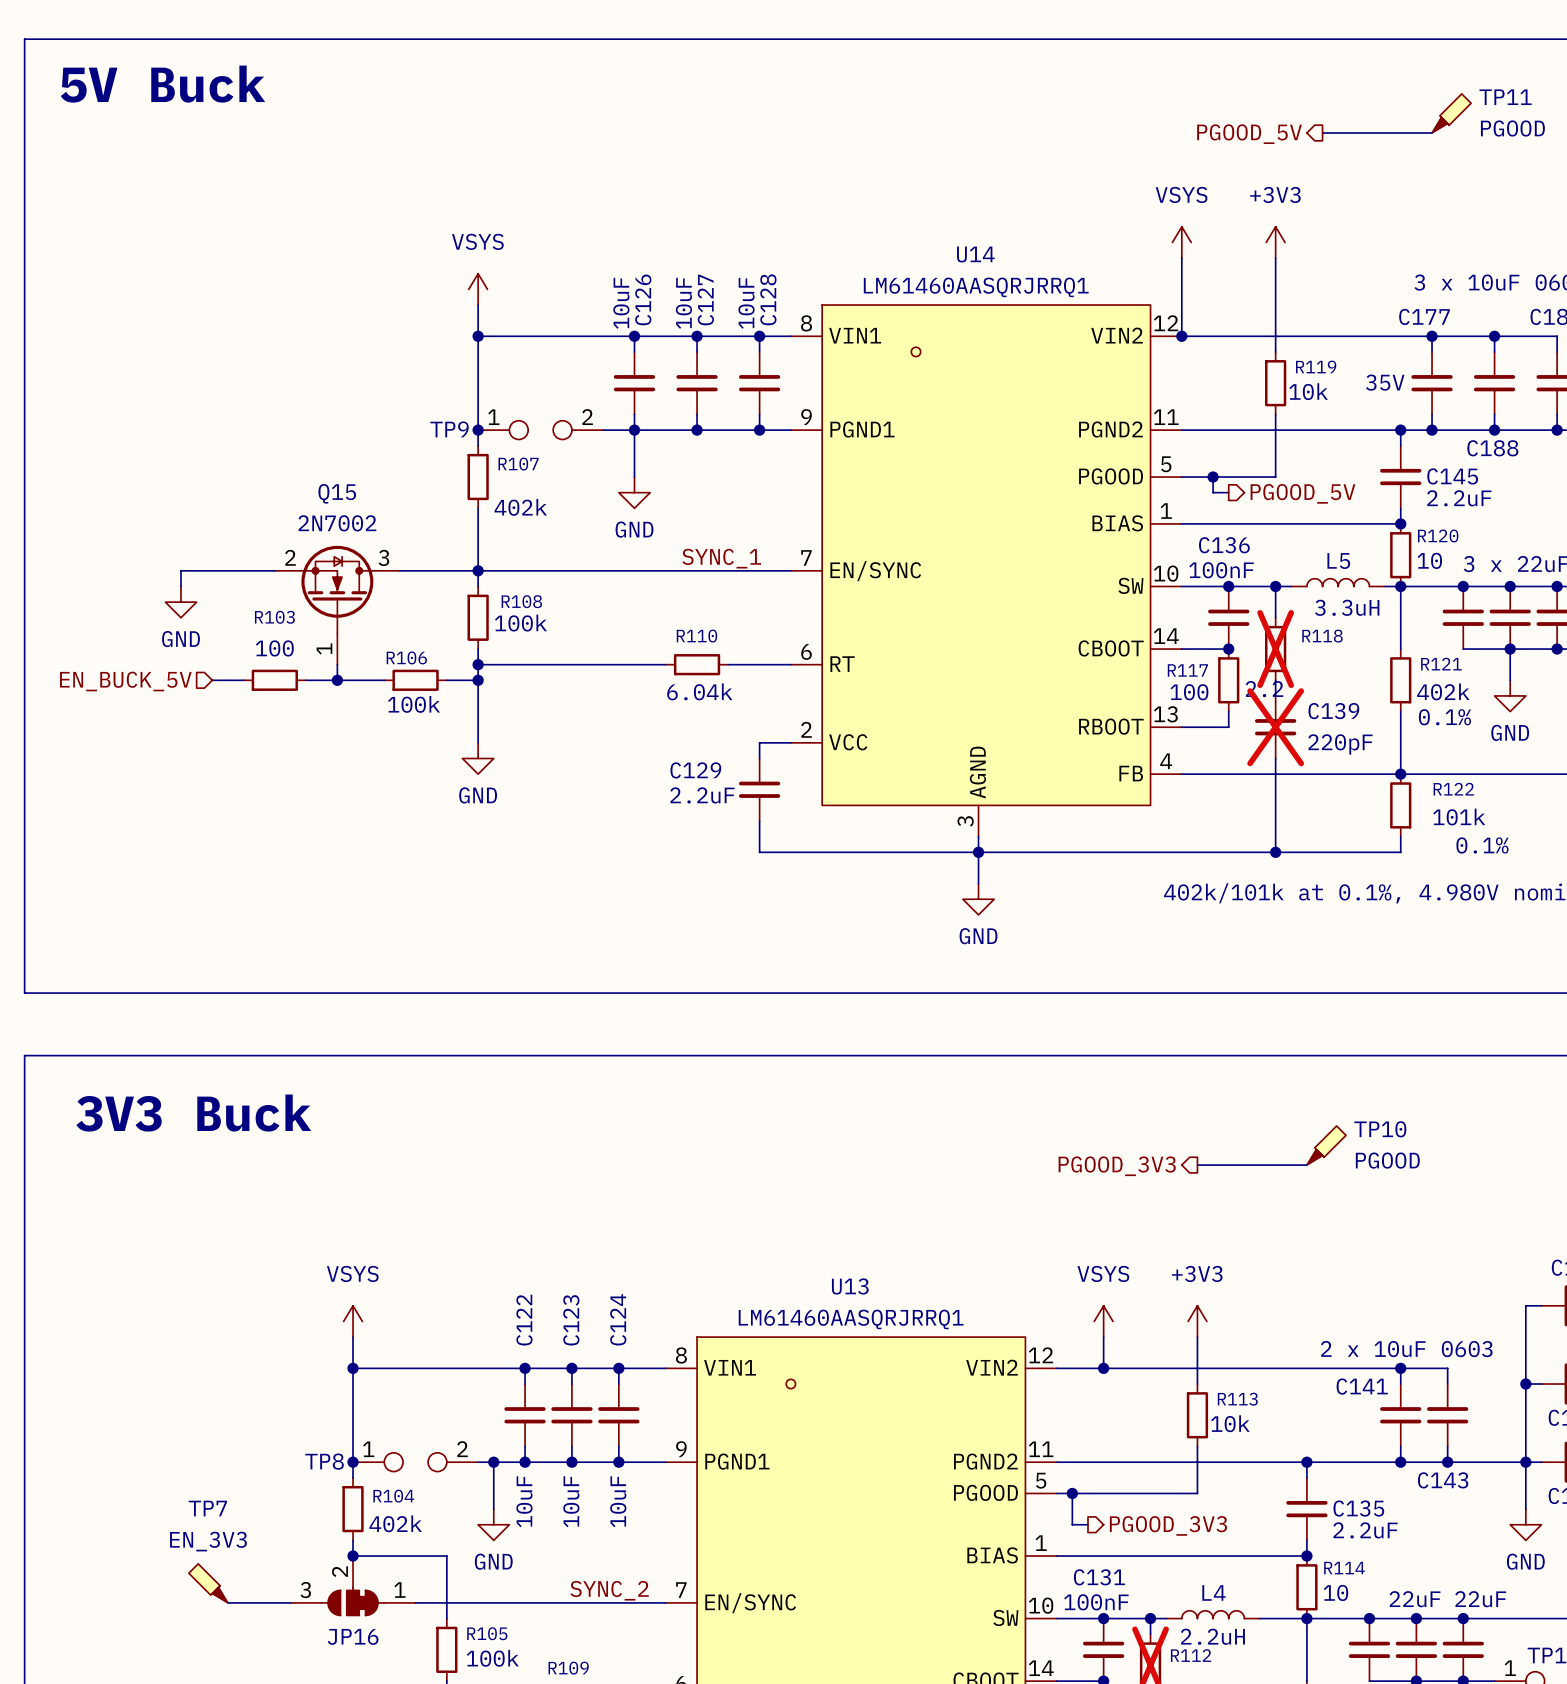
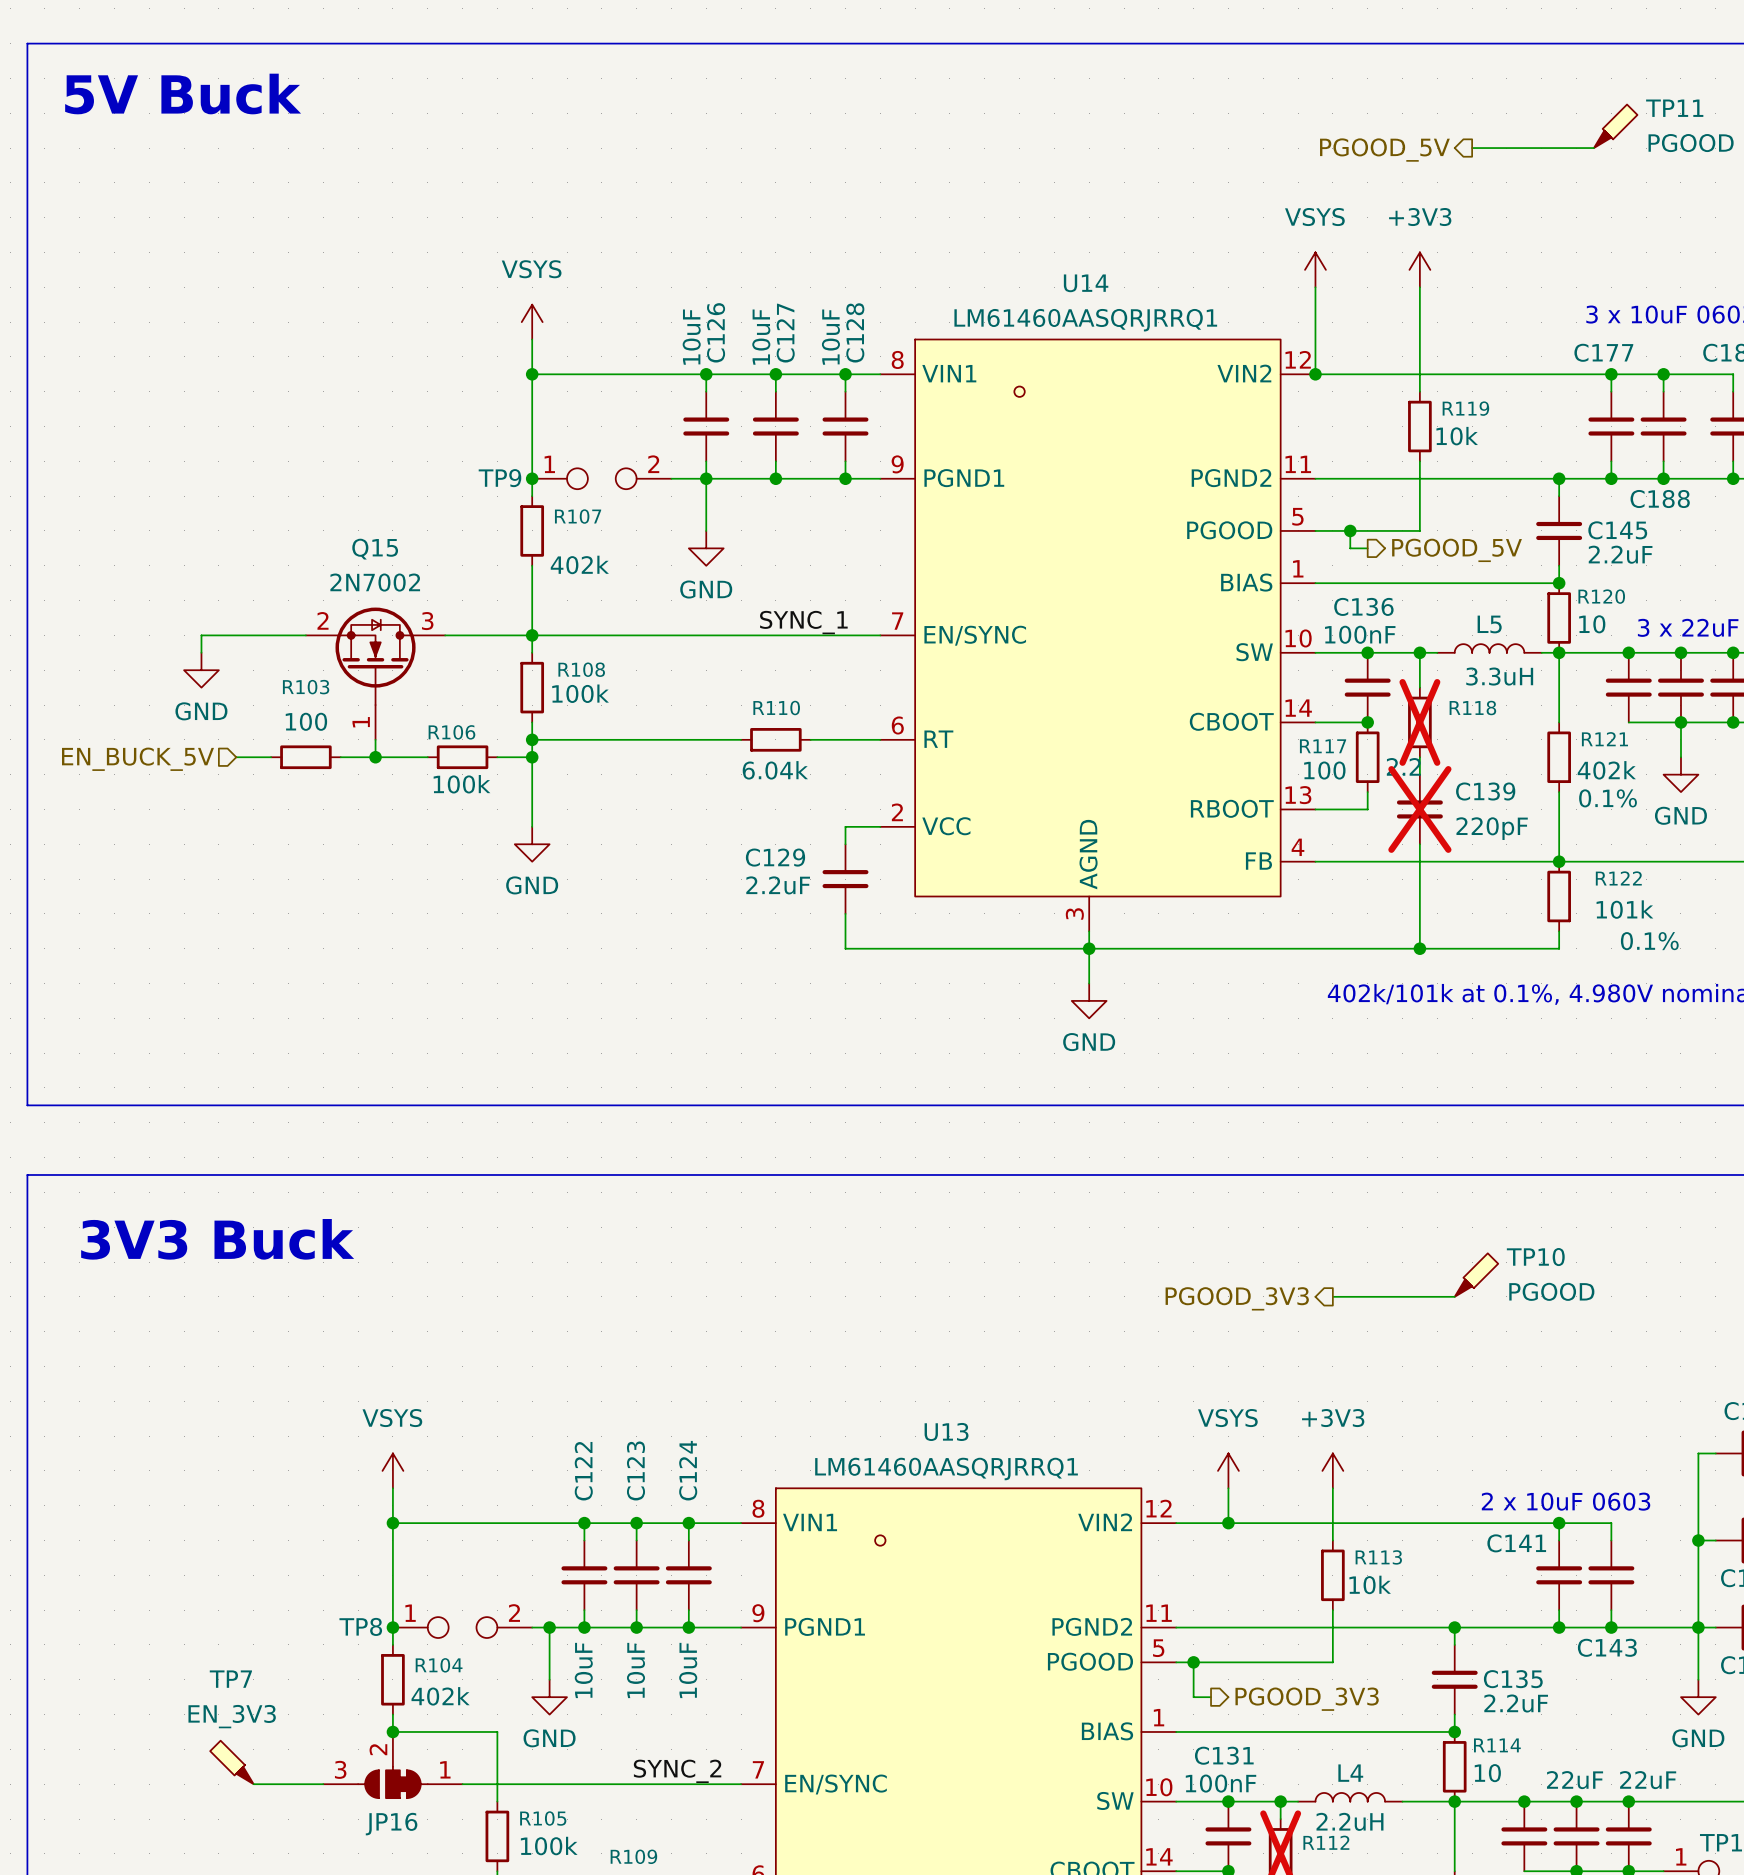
wire: (1432, 336) (1432, 351) -> (1611, 374) (1611, 391)
junction position: (1432, 336) -> (1611, 374)
C177 text: 35V (1385, 382) -> none
C177 position: (1432, 383) -> (1611, 426)
wire: (1432, 414) (1432, 430) -> (1611, 461) (1611, 478)
junction position: (1432, 430) -> (1611, 478)

